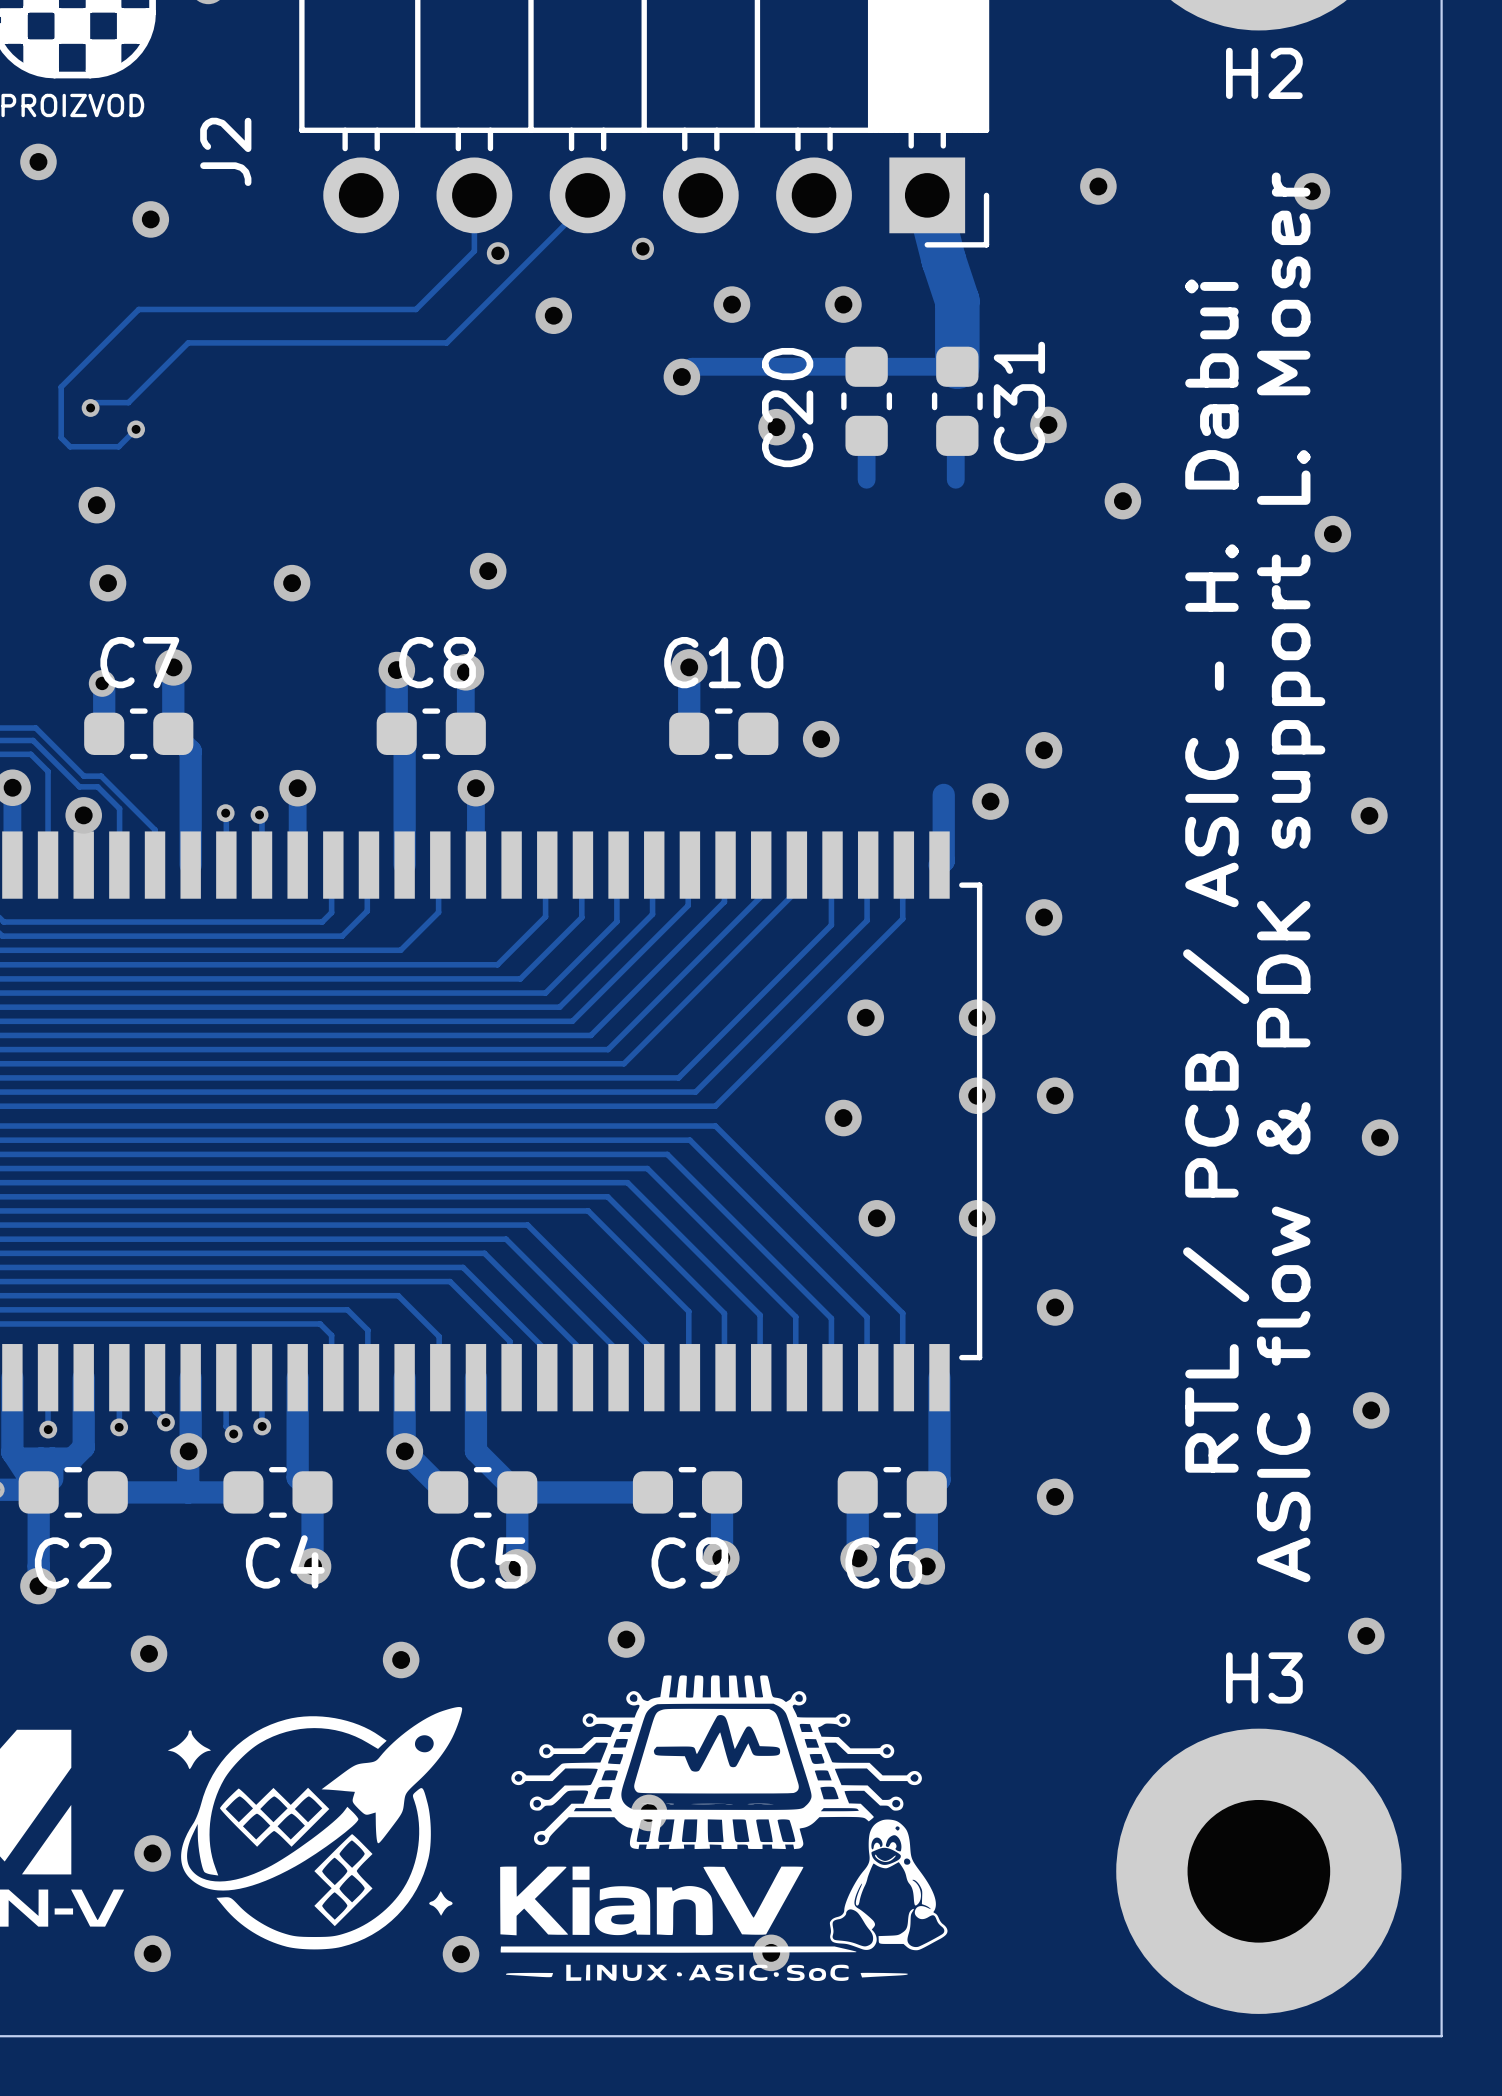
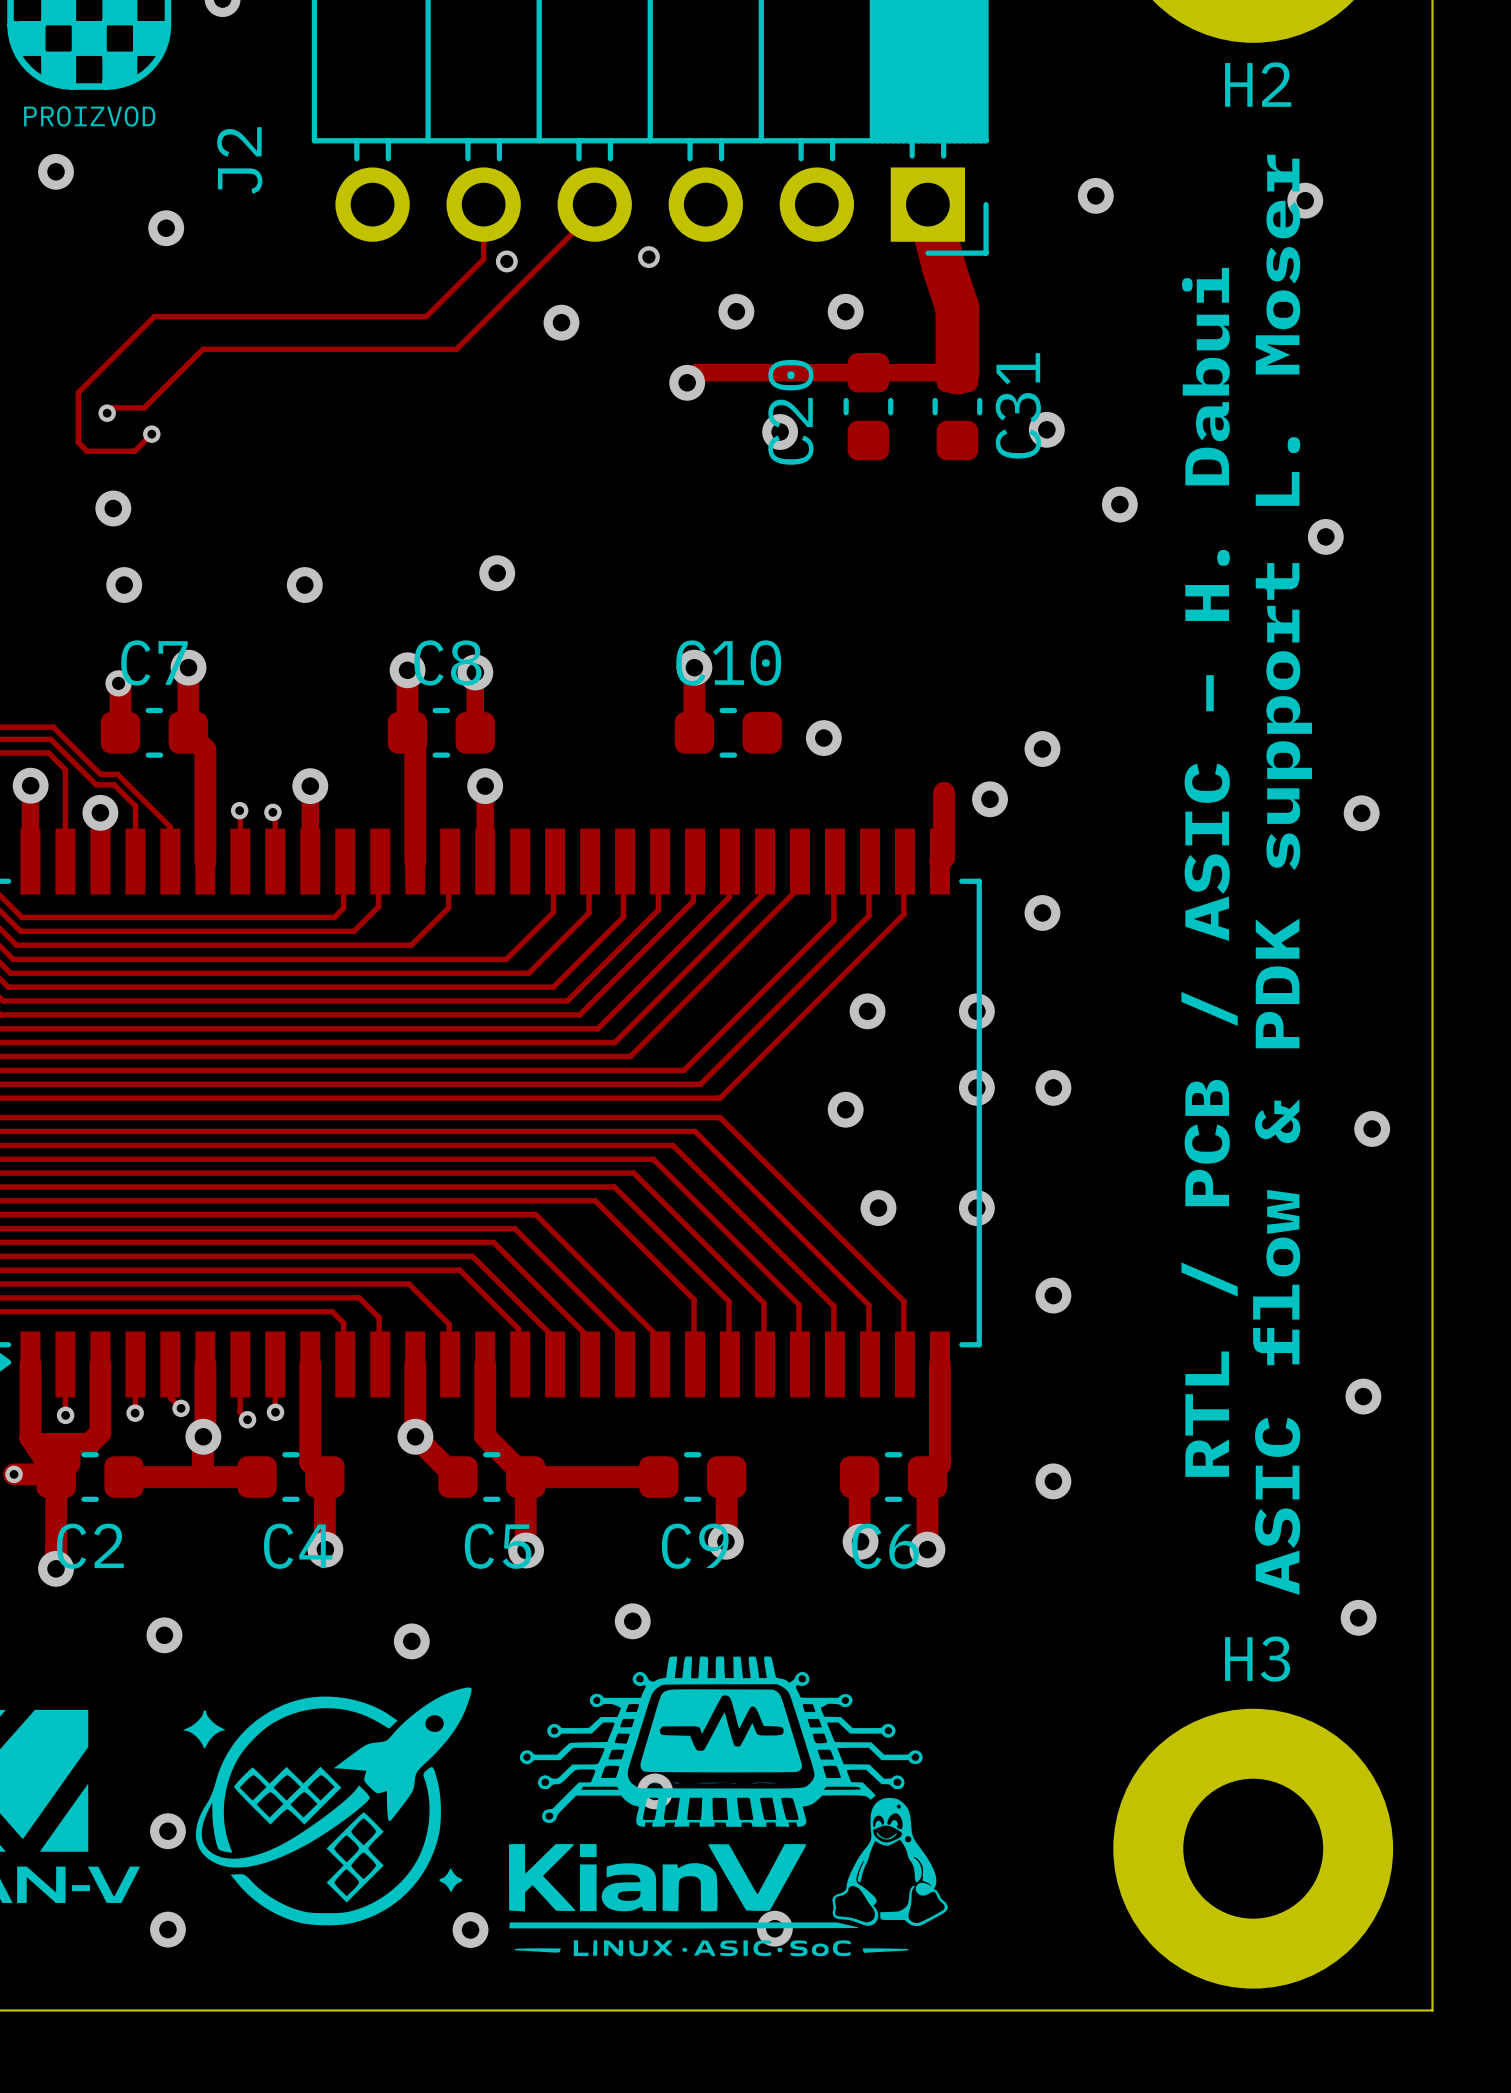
track: (866, 435) (866, 479) -> none
track: (955, 435) (955, 479) -> none

